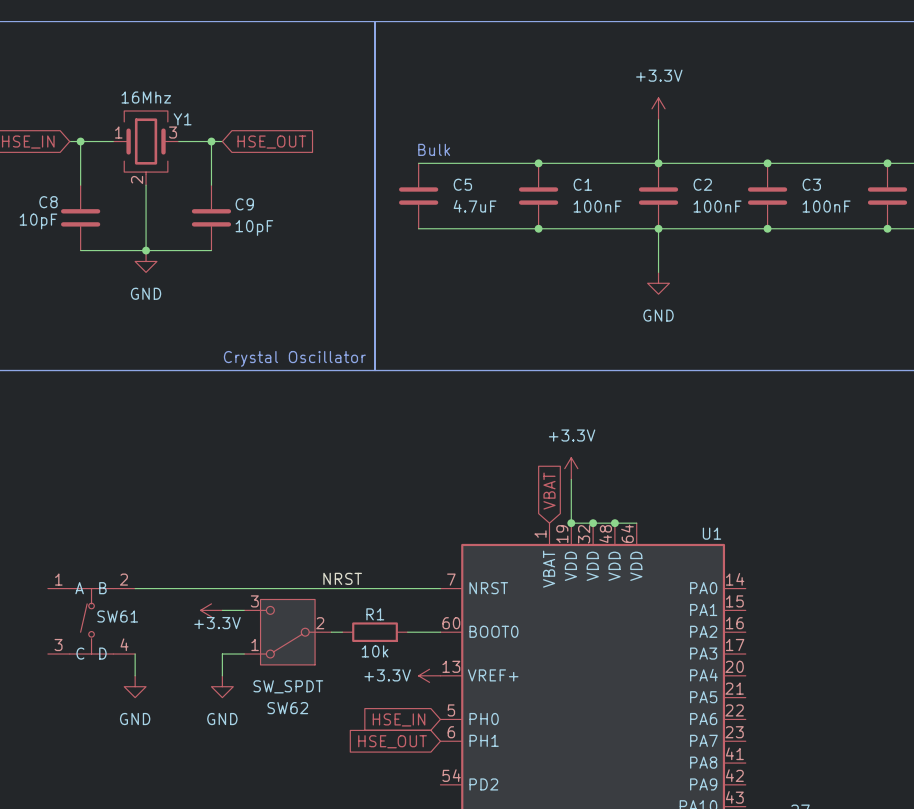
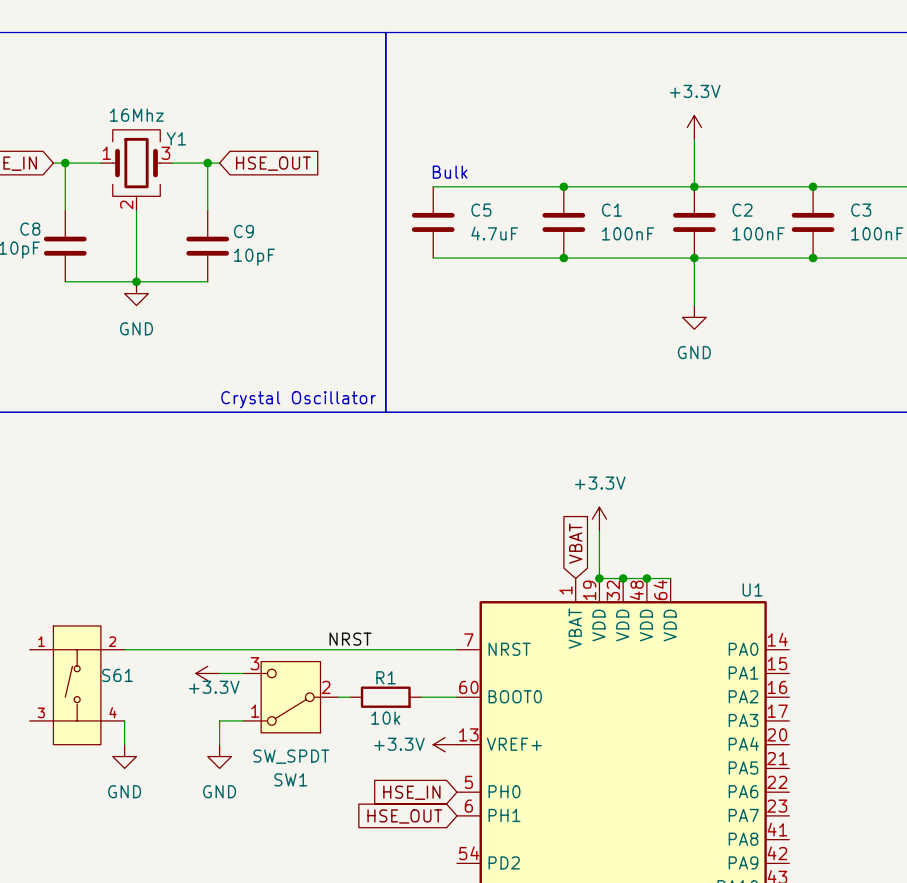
SW61: (91, 621) -> none
S61: none -> (77, 685)
SW62 name: SW62 (287, 708) -> SW1 (290, 779)

